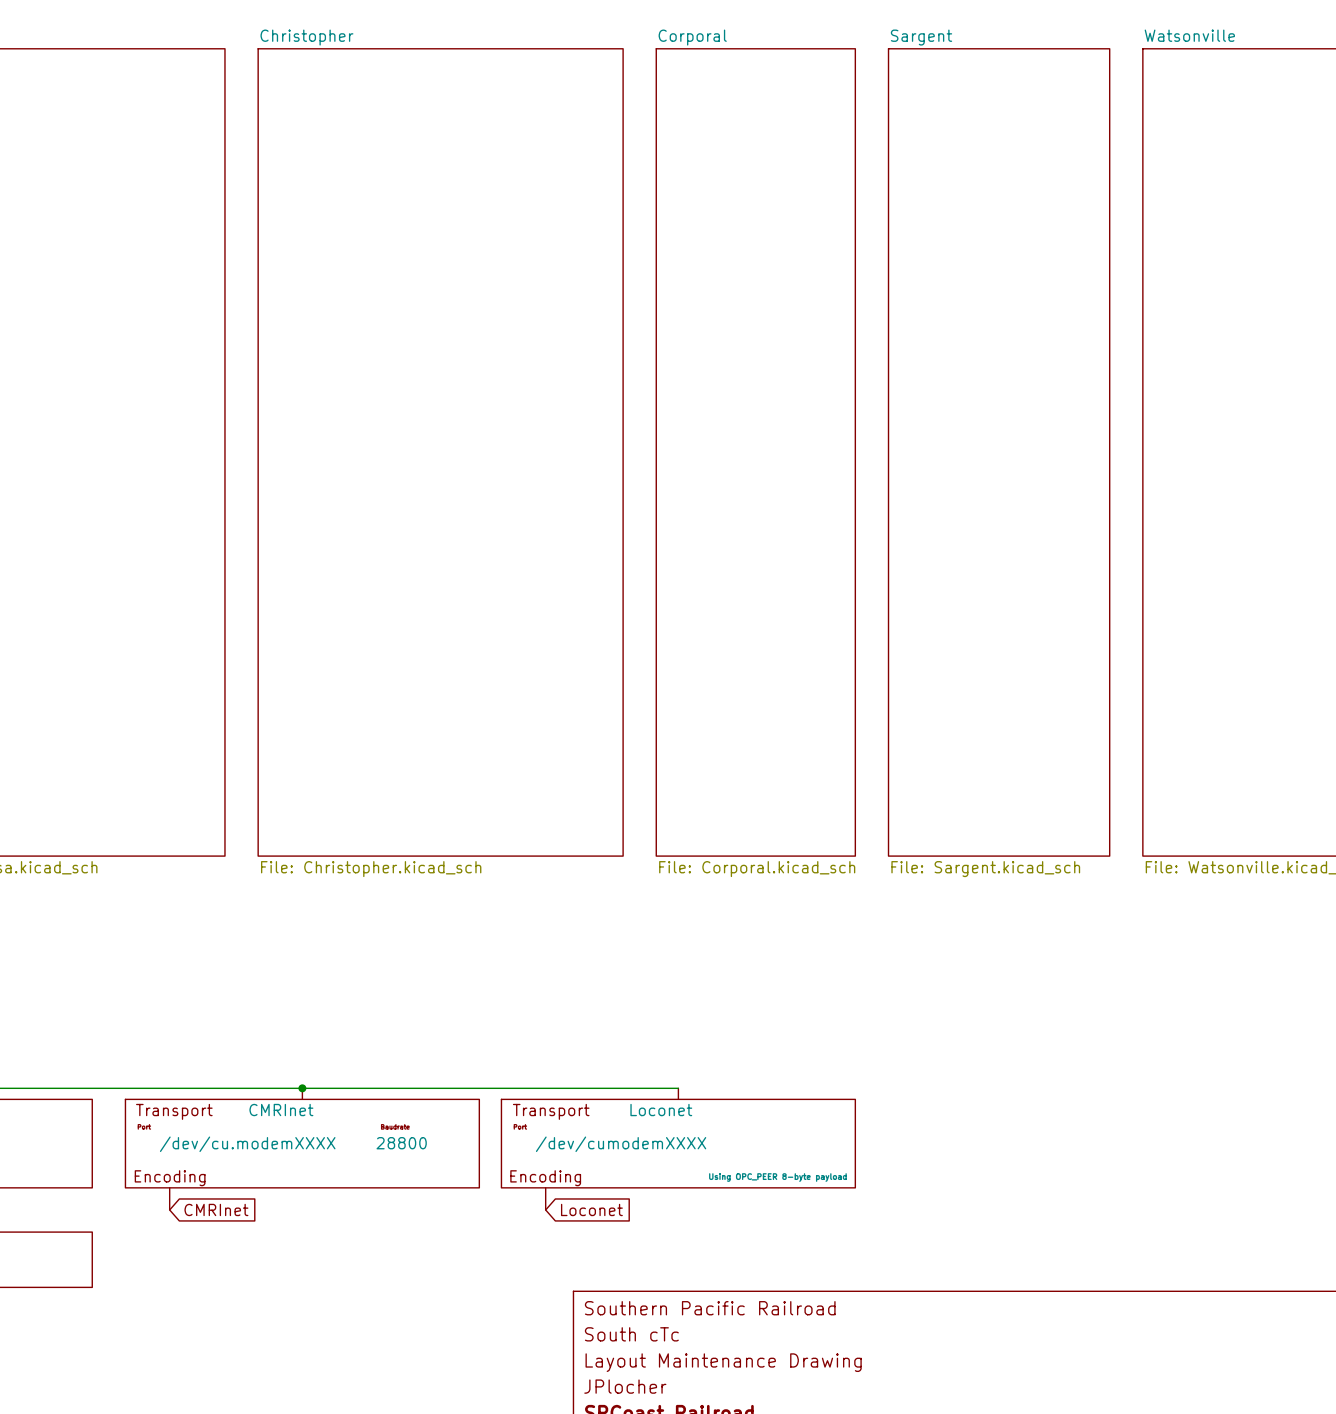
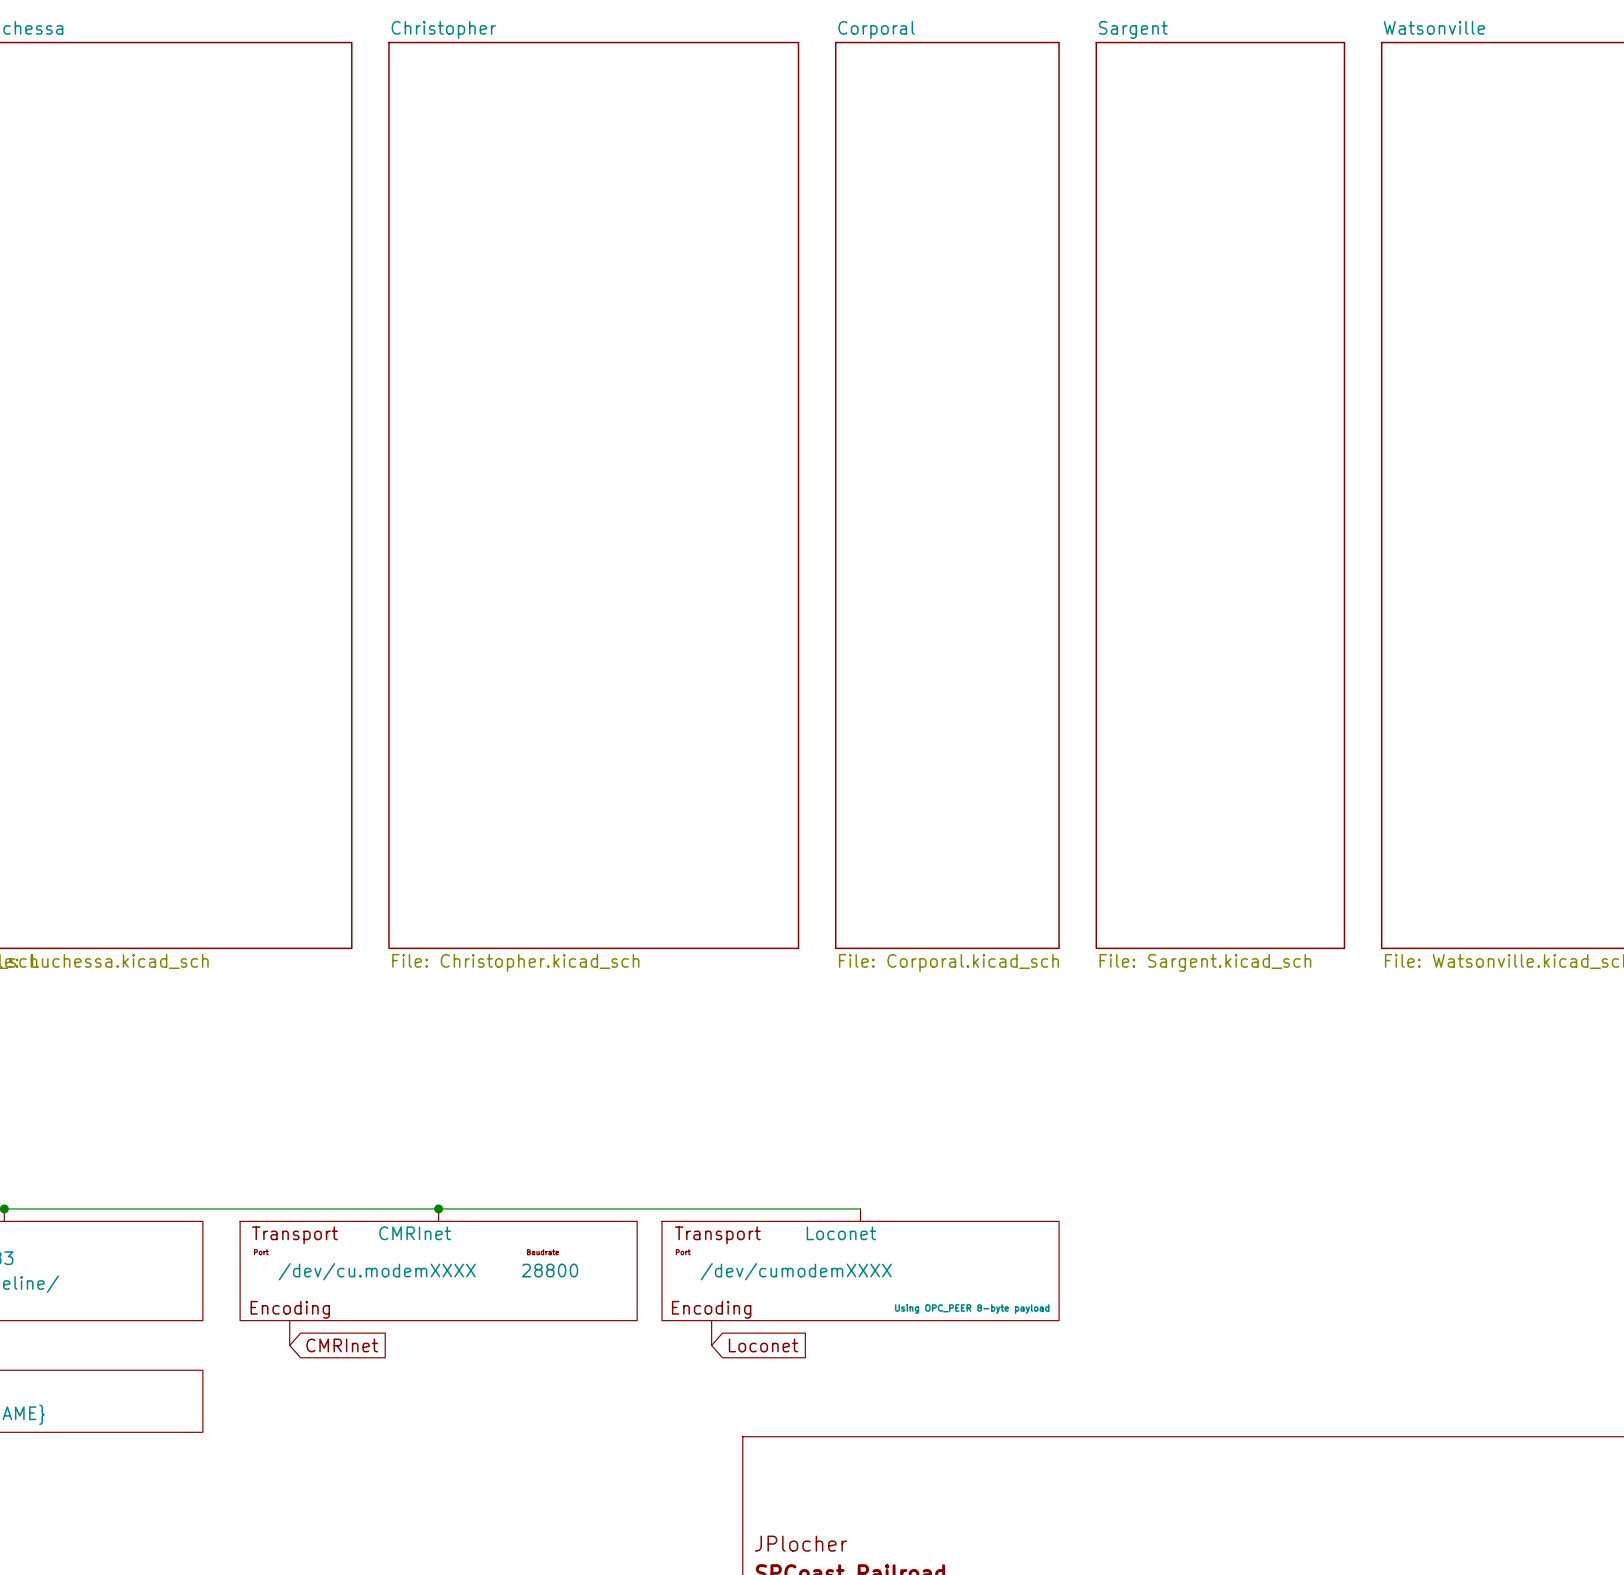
title block: Southern Pacific Railroad (710, 1308) -> none
title block: South cTc (631, 1334) -> none
title block: Layout Maintenance Drawing (723, 1362) -> none

